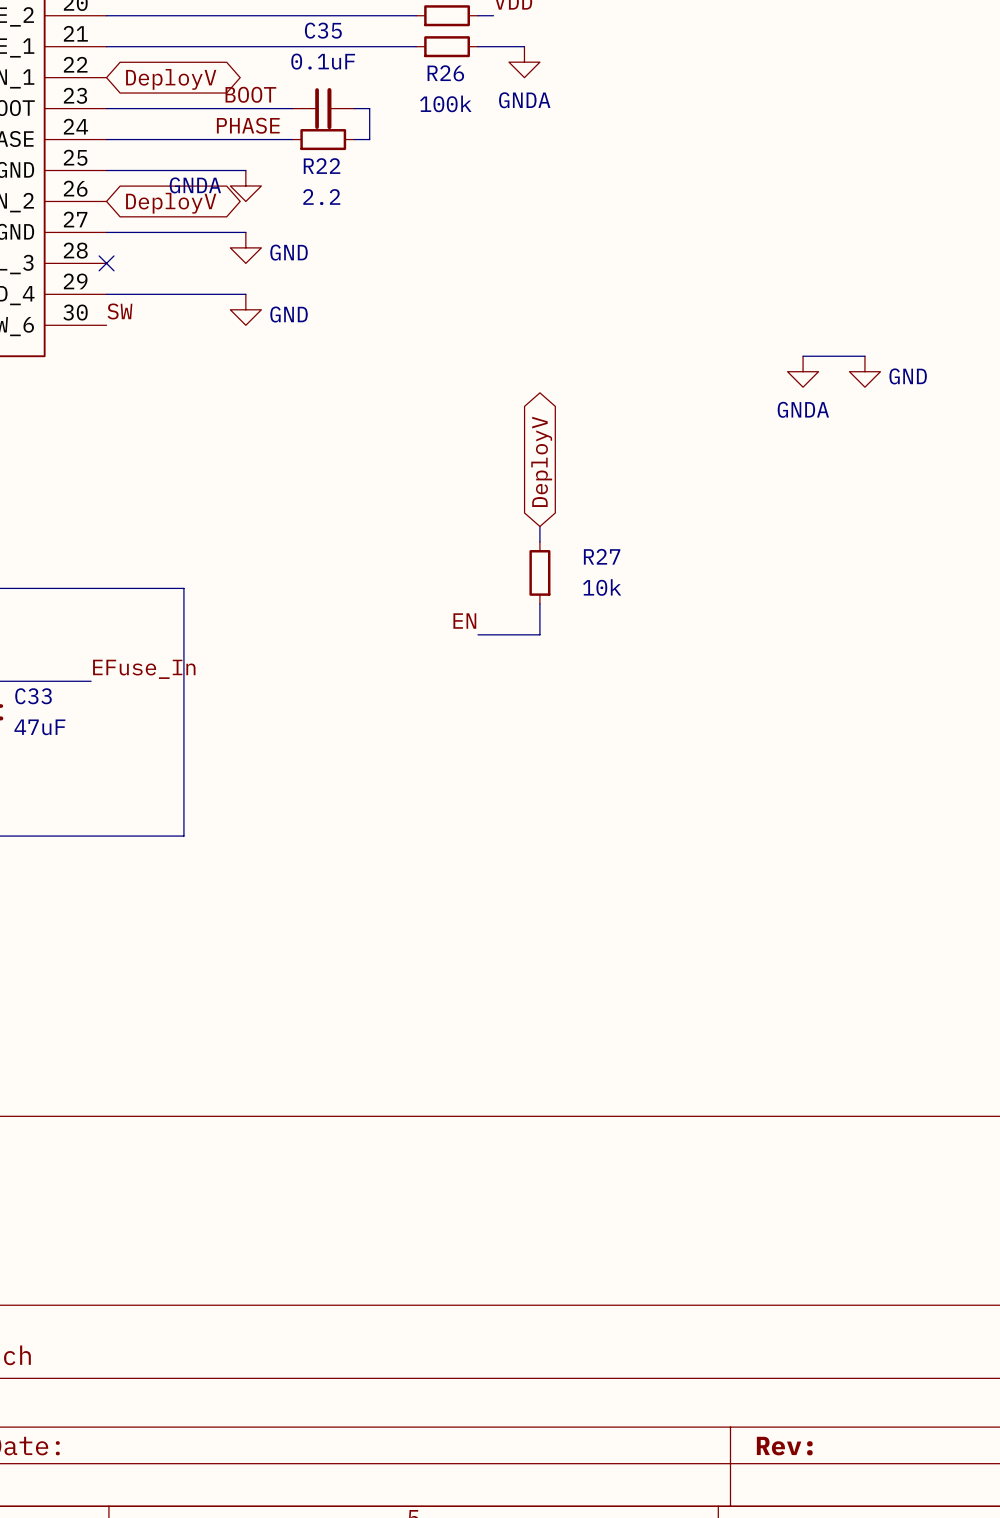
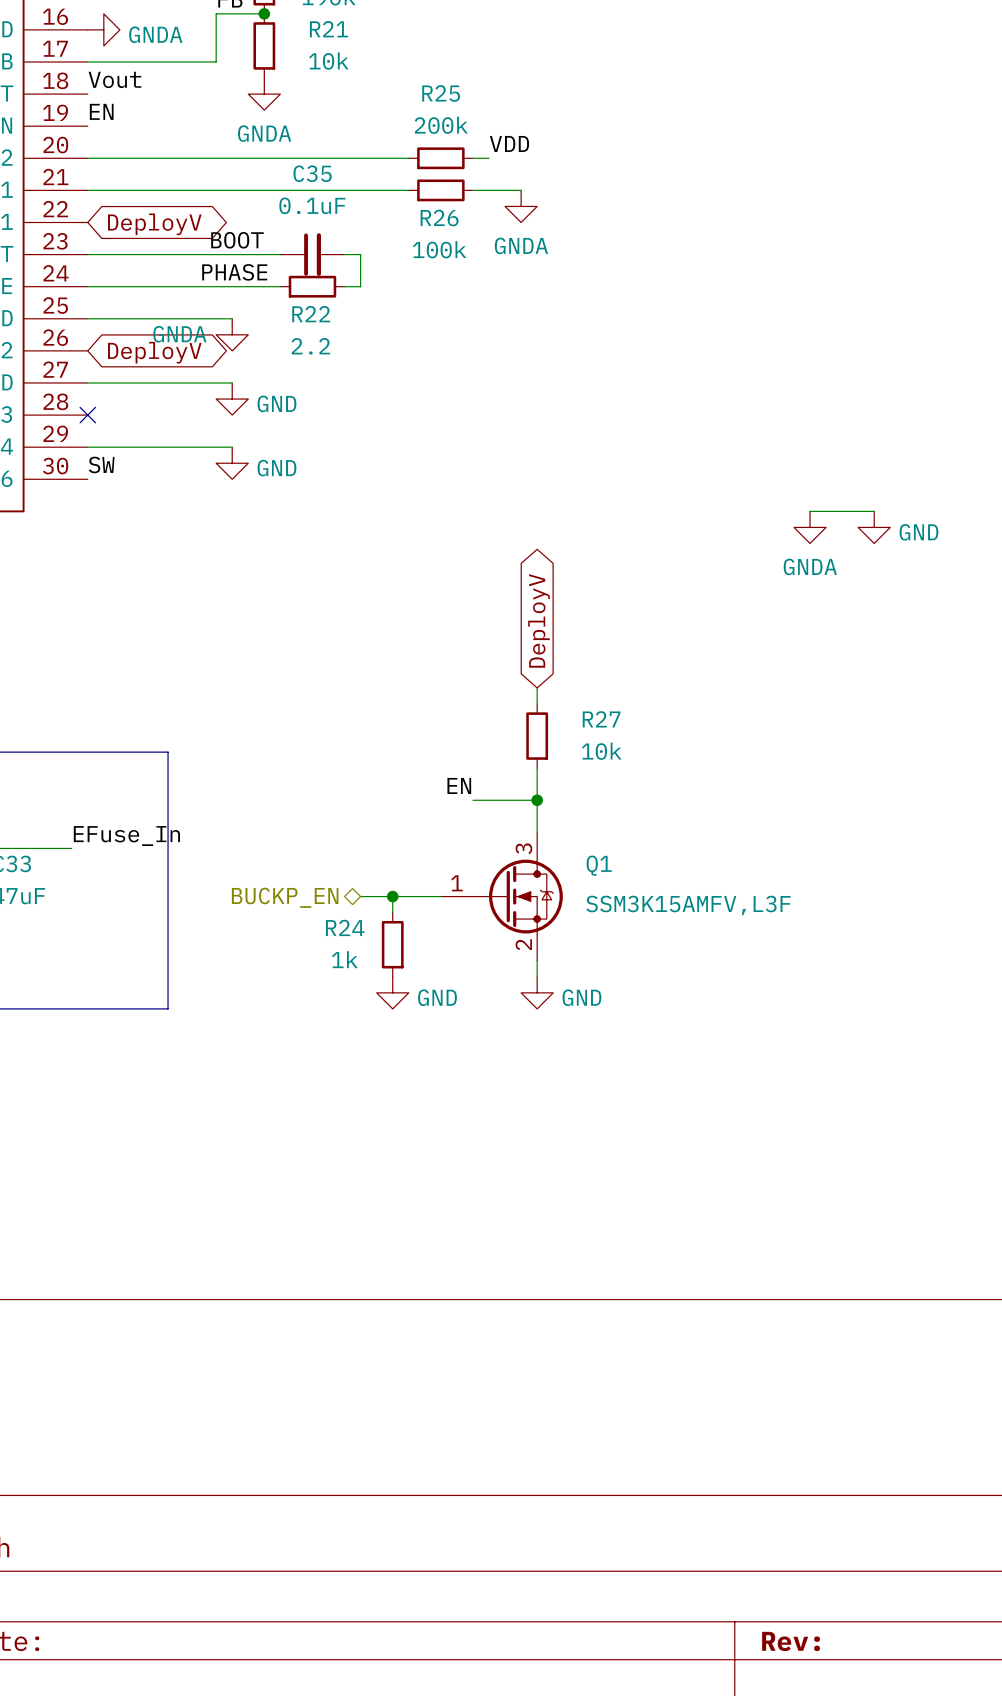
wire: none -> (537, 800) (537, 832)
junction: none -> (537, 800)
wire: none -> (360, 896) (440, 896)
wire: none -> (392, 896) (392, 912)
junction: none -> (392, 896)
Q1: none -> SSM3K15AMFV,L3F (501, 896)
hierarchical label: none -> BUCKP_EN (285, 897)
R24: none -> 1k (392, 944)
wire: none -> (537, 960) (537, 976)
power symbol: none -> GND (392, 992)
power symbol: none -> GND (537, 992)

